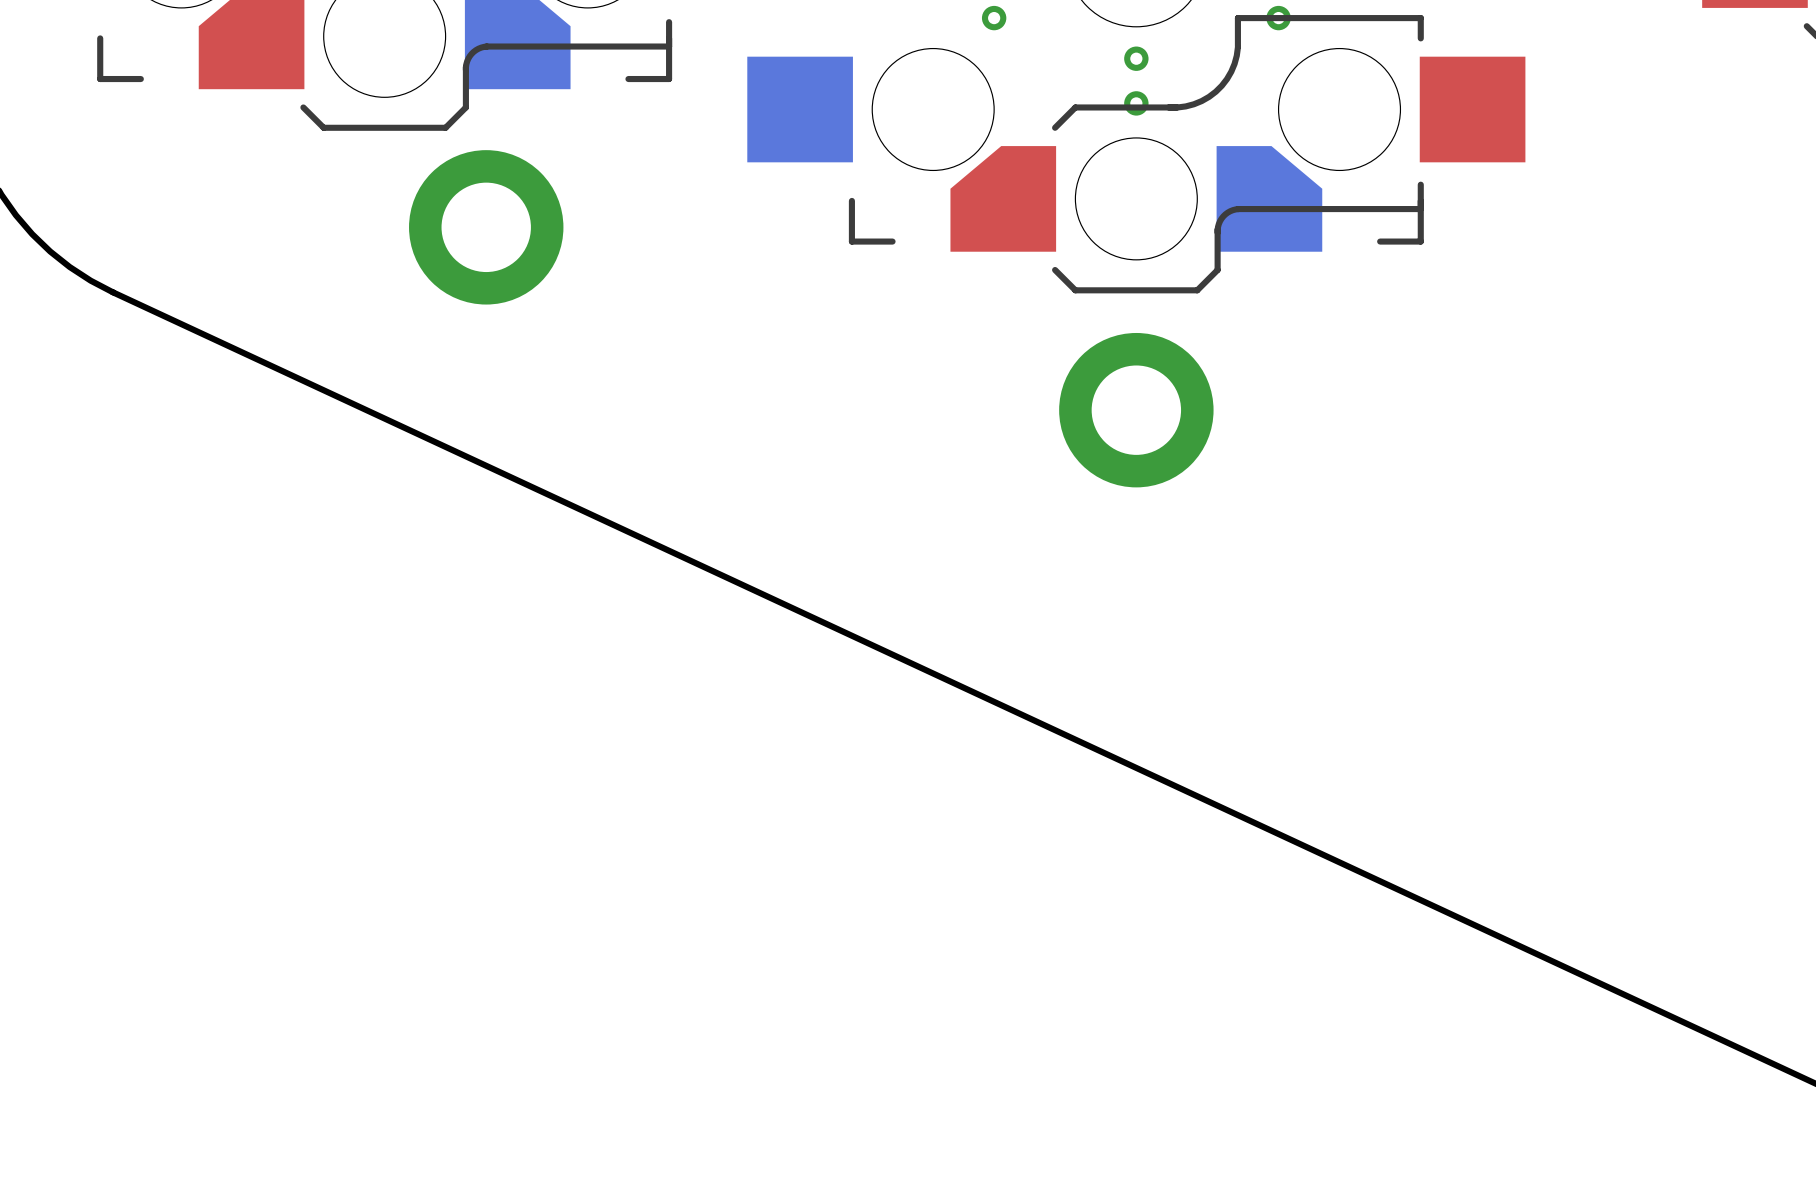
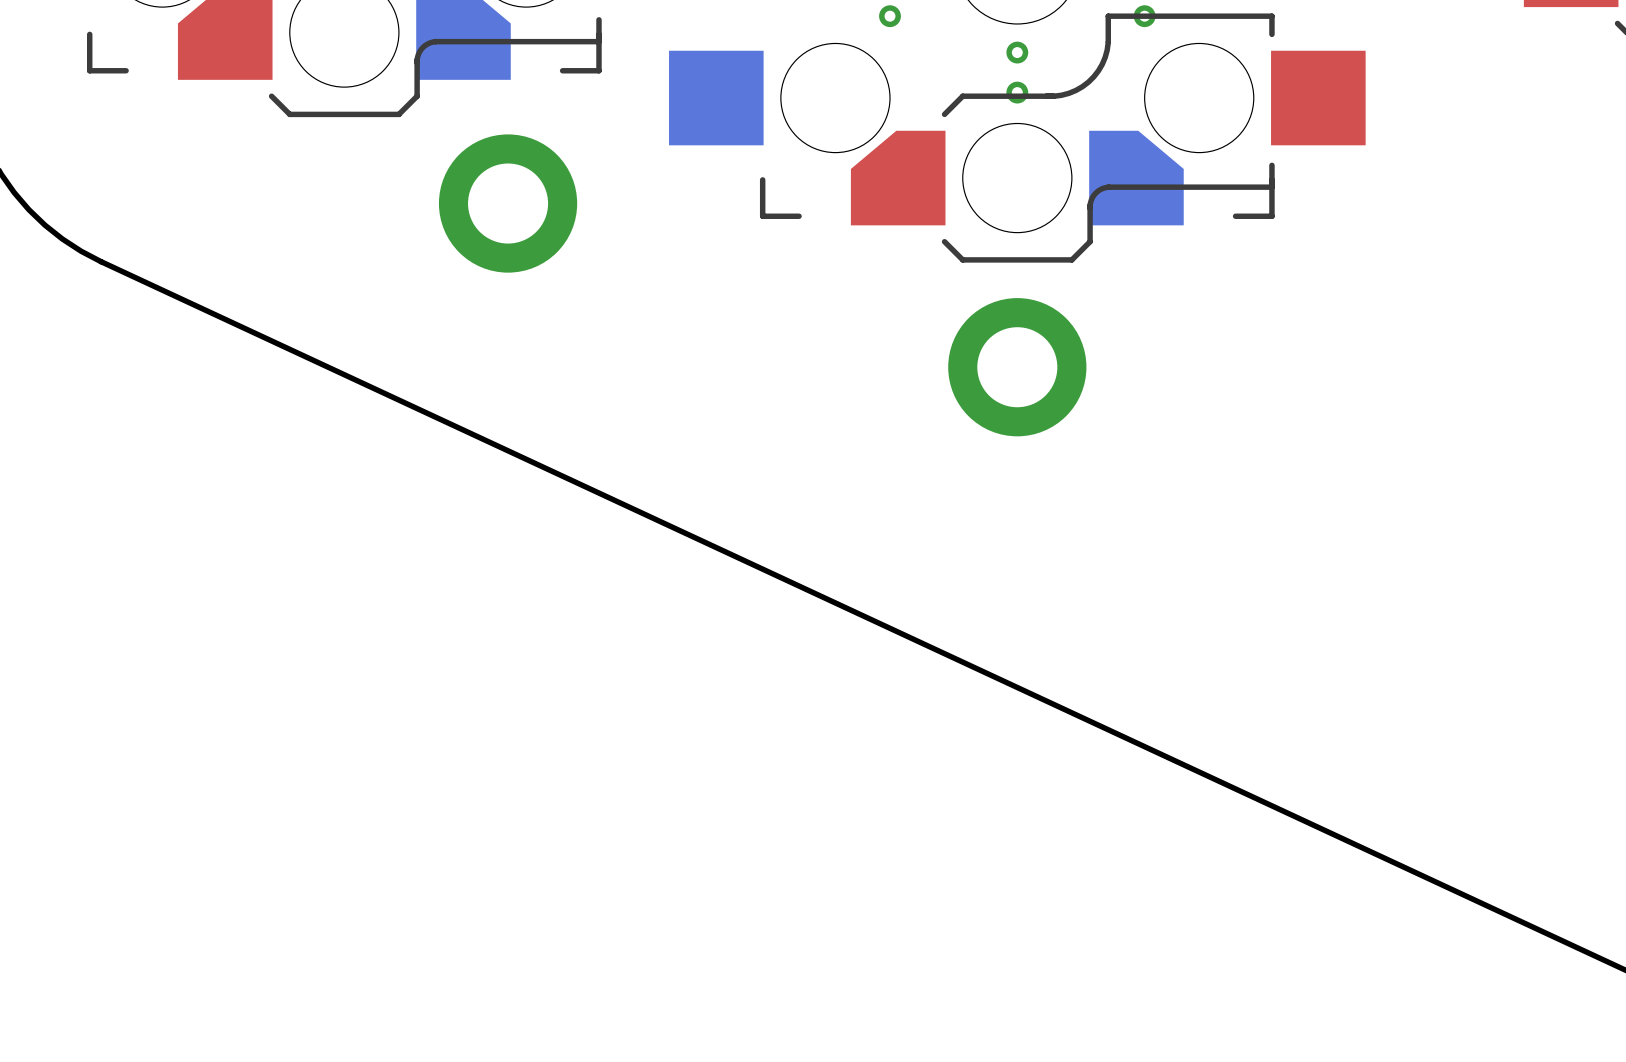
part position: (486, 227) -> (508, 203)

